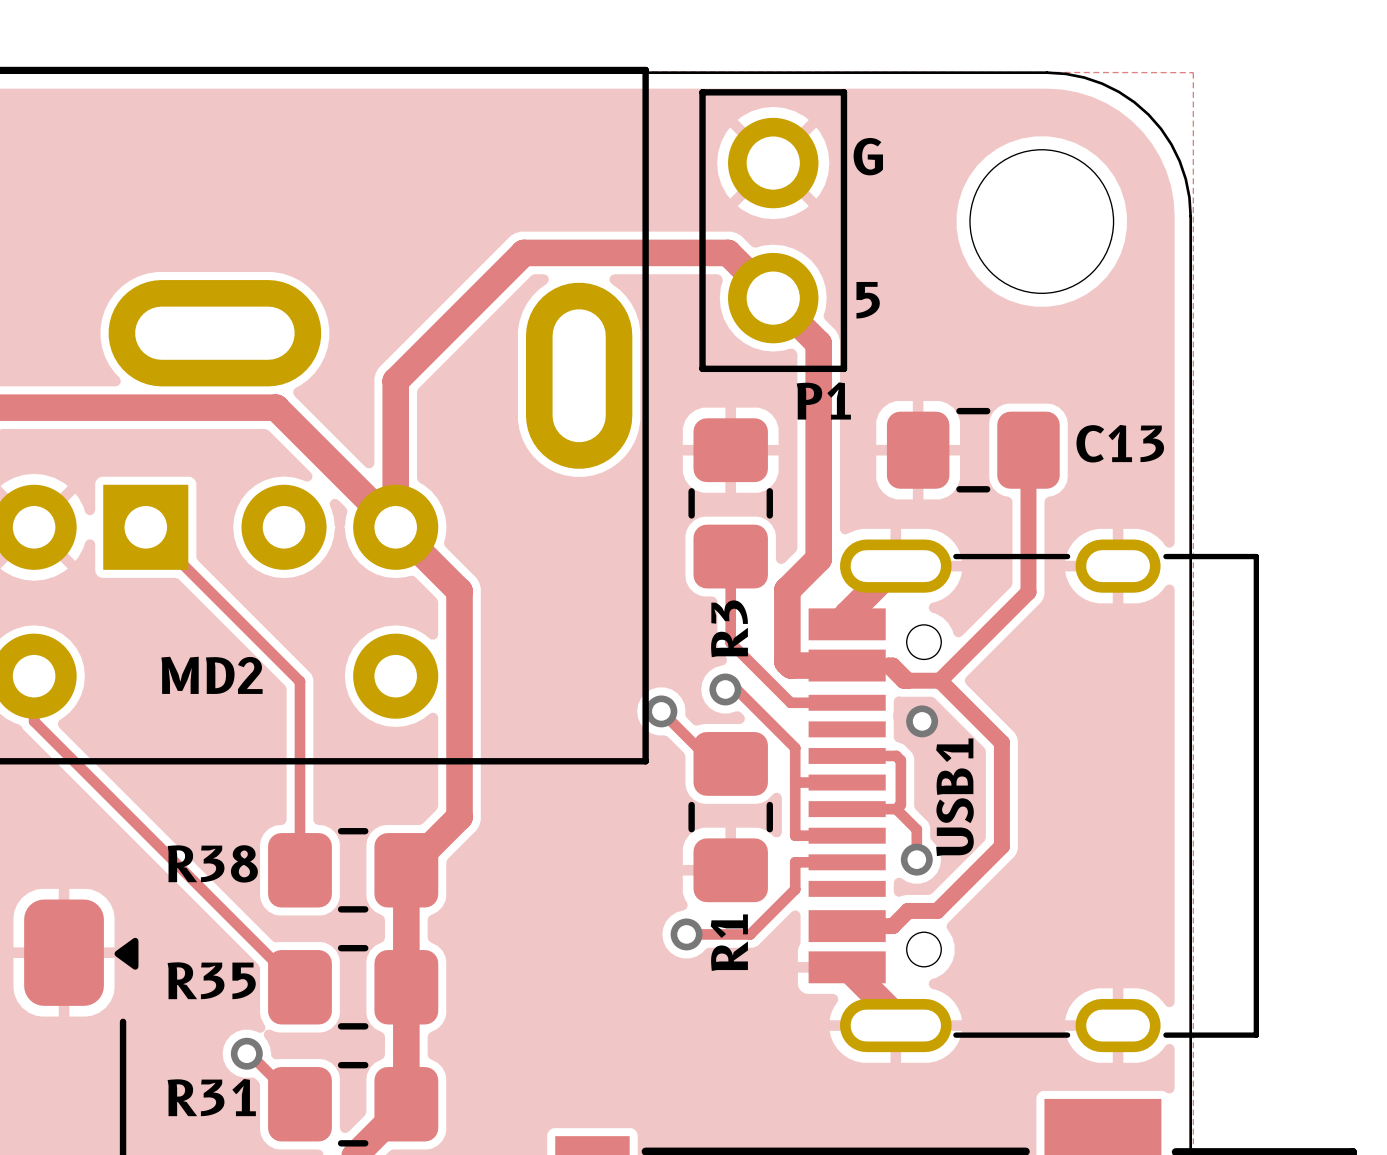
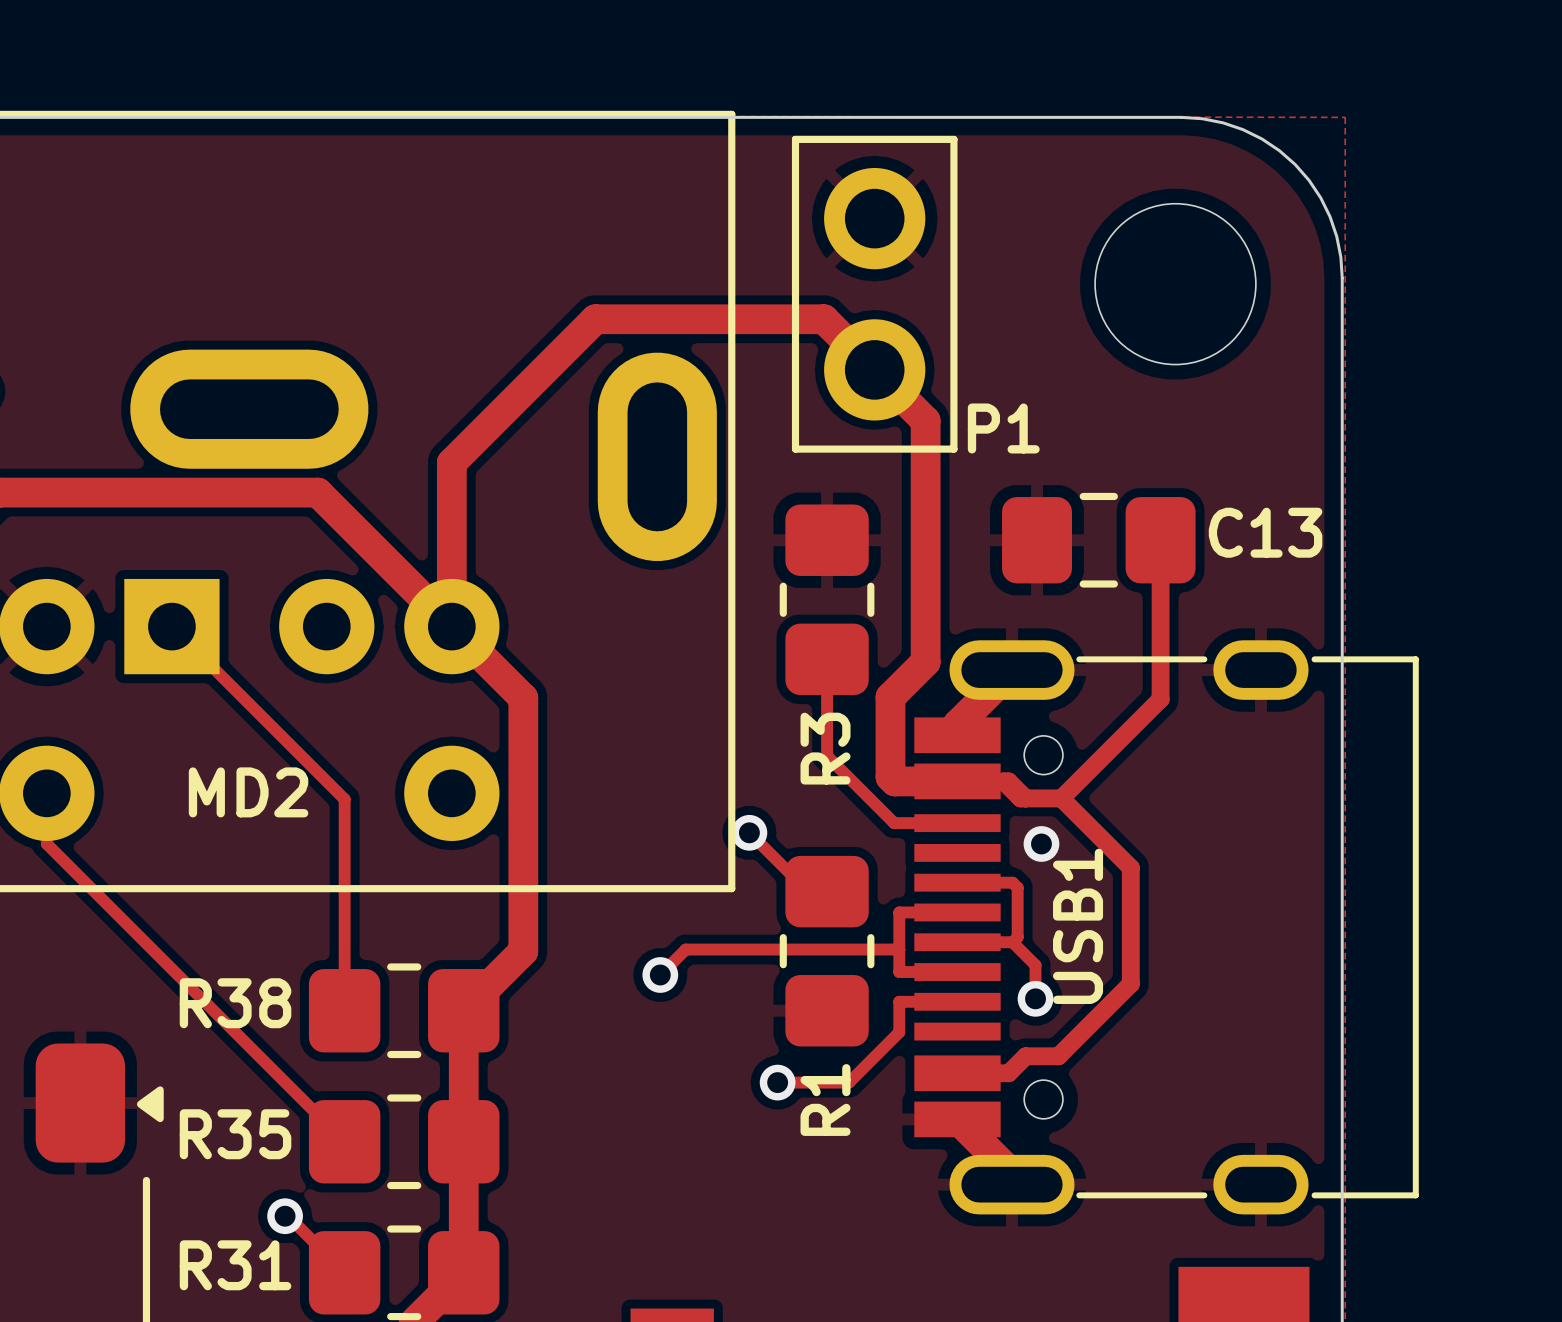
text: G (868, 156) -> none
text: 5 (868, 300) -> none
P1 name position: P1 (823, 400) -> P1 (1003, 428)
track: (725, 689) (736, 689) (795, 747) (795, 782) -> none
via position: (725, 689) -> (660, 975)
track: none -> (899, 949) (685, 949) (660, 975)

